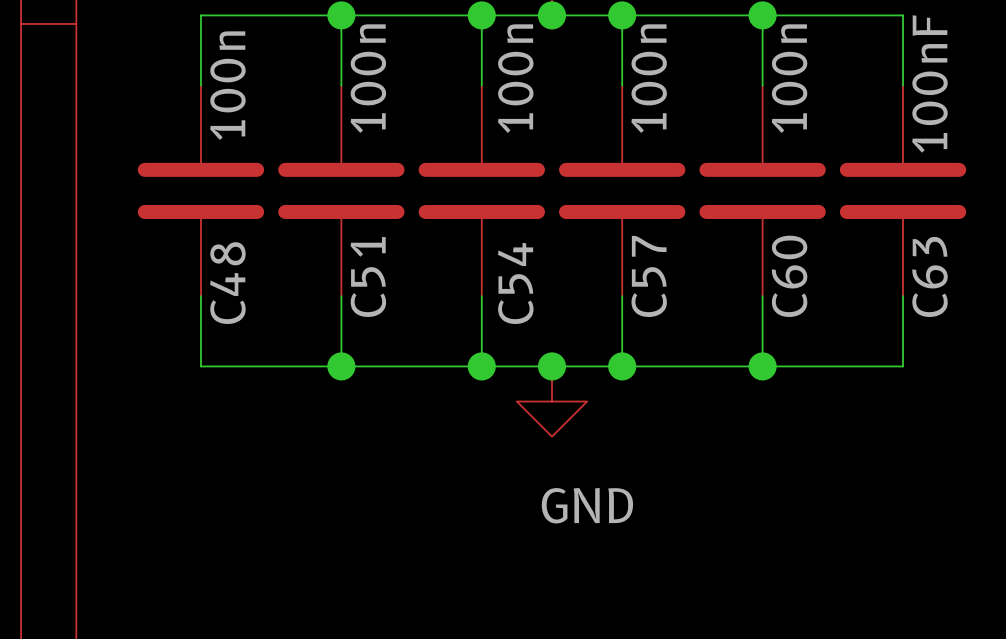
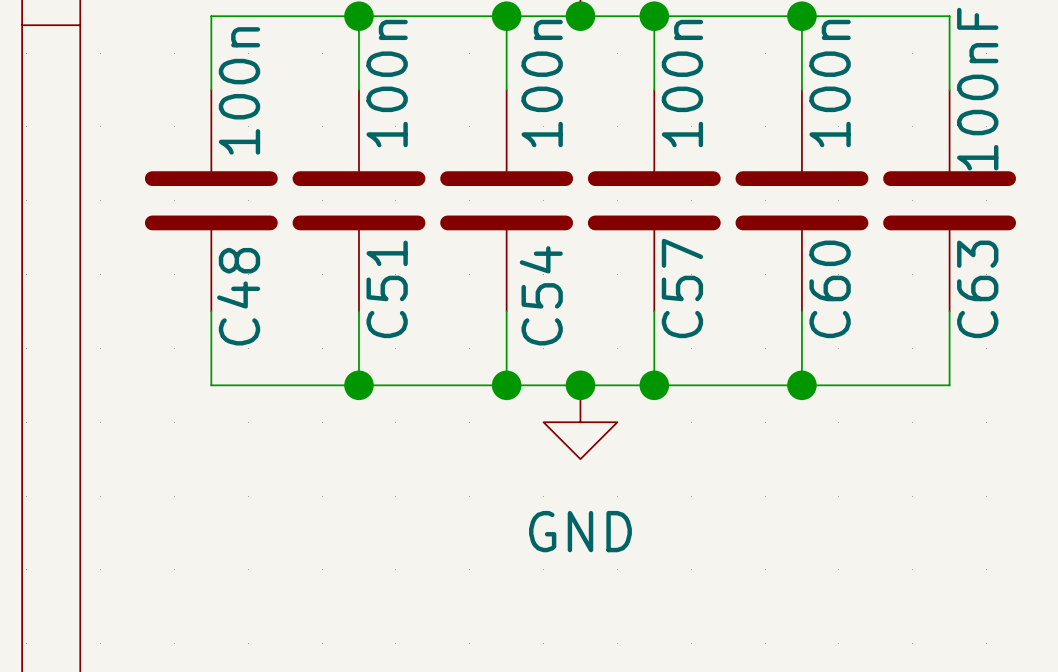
power symbol text position: GND (587, 505) -> GND (580, 531)

